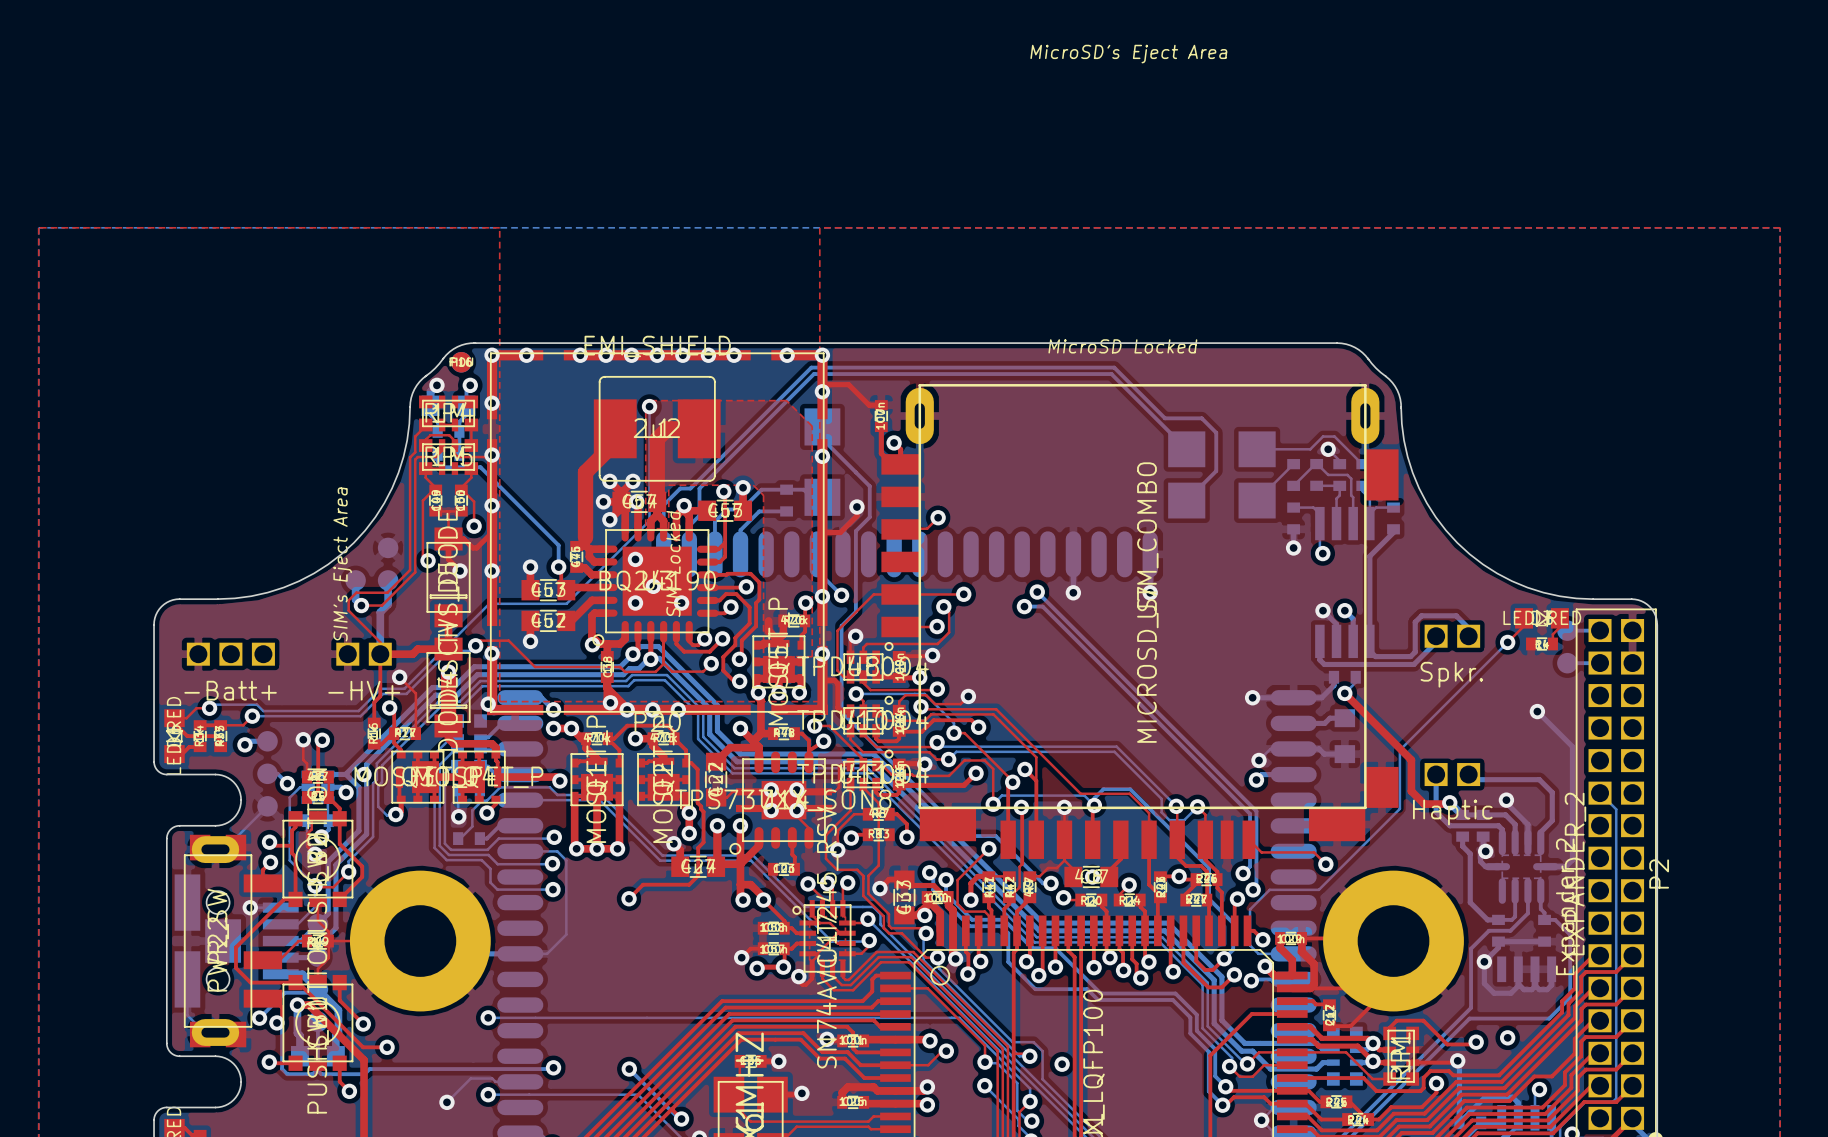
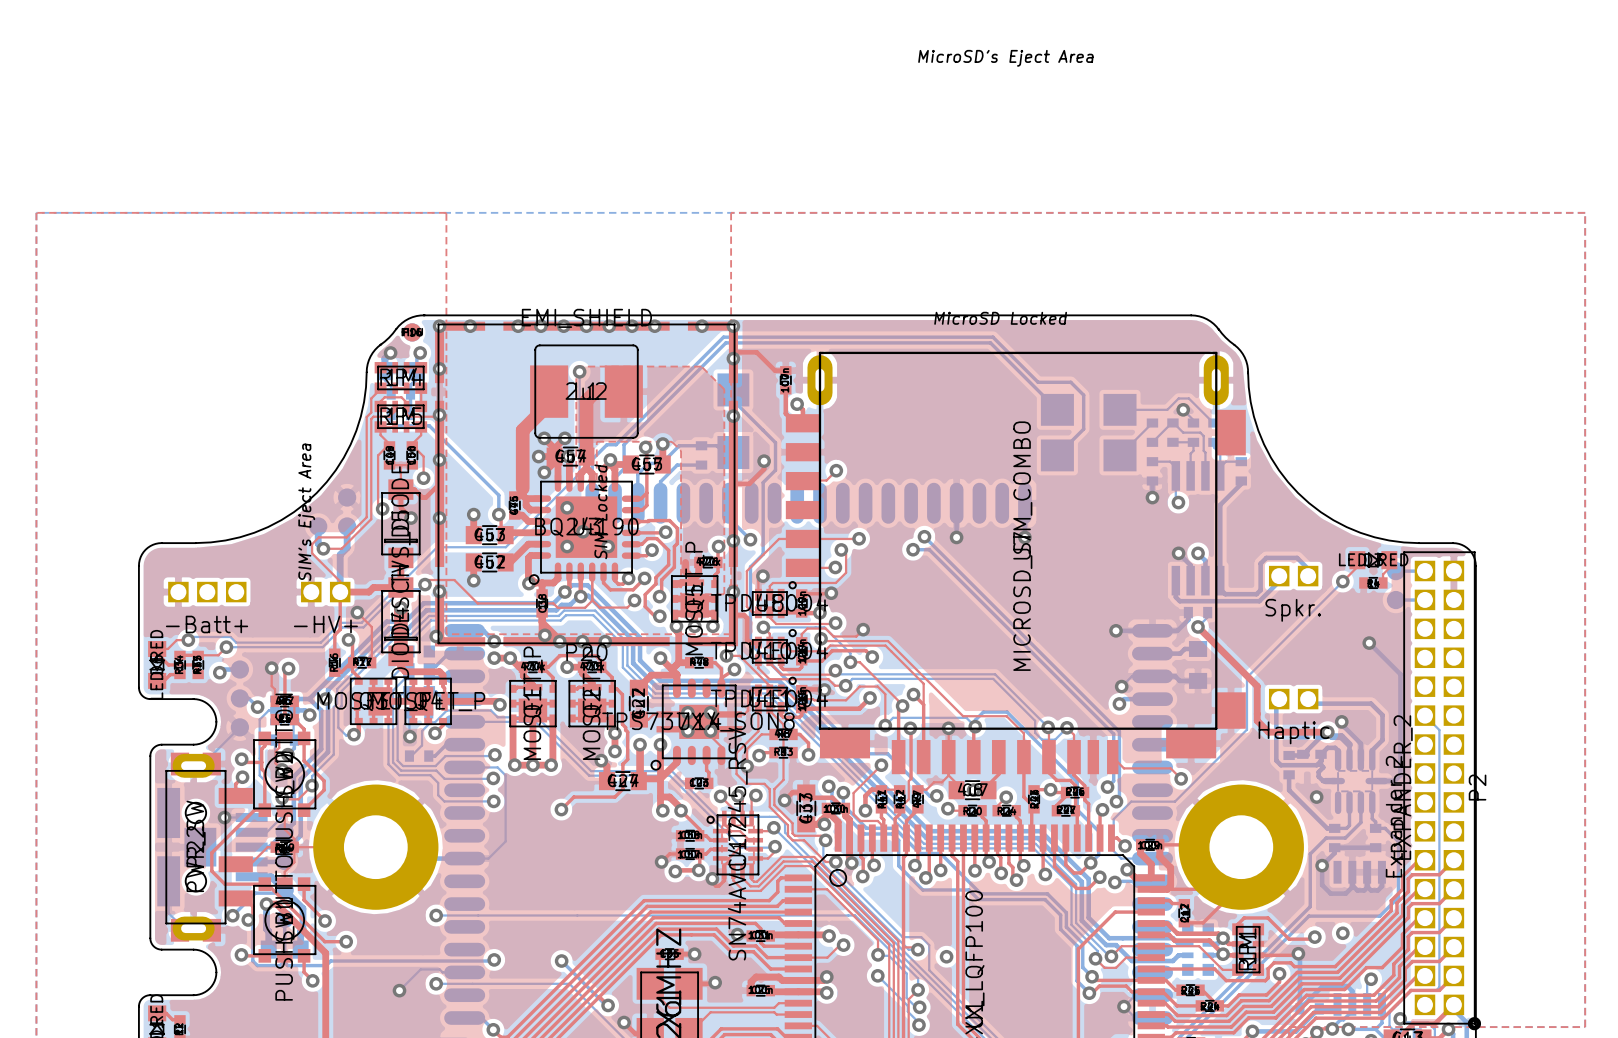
bottom track: (1436, 774) (1436, 811) (1449, 825) (1498, 825) (1502, 832) -> (1279, 699) (1276, 701) (1276, 760) (1280, 765) (1316, 765) (1321, 760) (1321, 754) (1327, 747) (1335, 747) (1338, 750)
top track: (1411, 791) (1424, 804) (1449, 802) -> (1257, 713) (1257, 720) (1268, 732) (1327, 732)
bottom track: (1449, 802) (1461, 814) (1505, 814) (1515, 825) -> (1289, 755) (1307, 755) (1307, 750) (1325, 732) (1332, 736) (1341, 736) (1349, 744)
via: (1449, 802) -> none
via: none -> (1327, 732)
bottom track: (1462, 836) (1462, 846) (1470, 853) (1470, 902) (1487, 919) (1490, 919) -> (1289, 774) (1289, 790) (1327, 828)
part: none -> (1289, 765)
via: (1485, 851) -> none
via: none -> (1316, 797)

